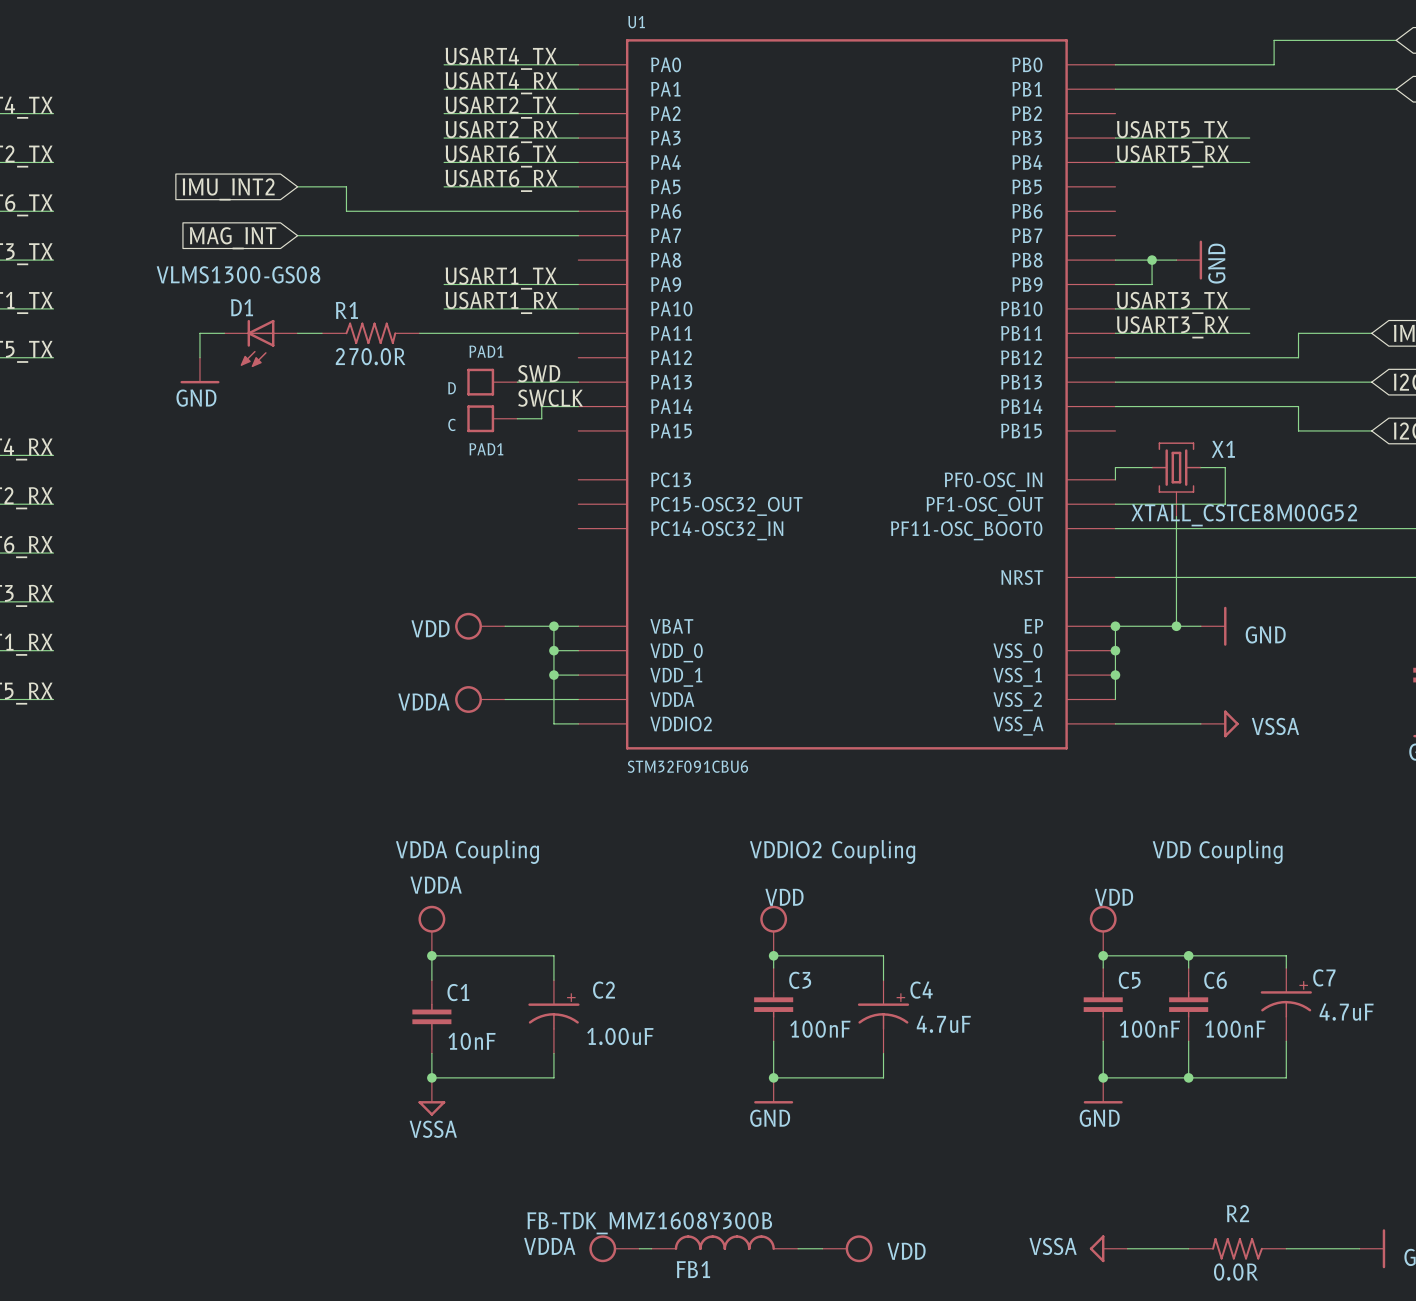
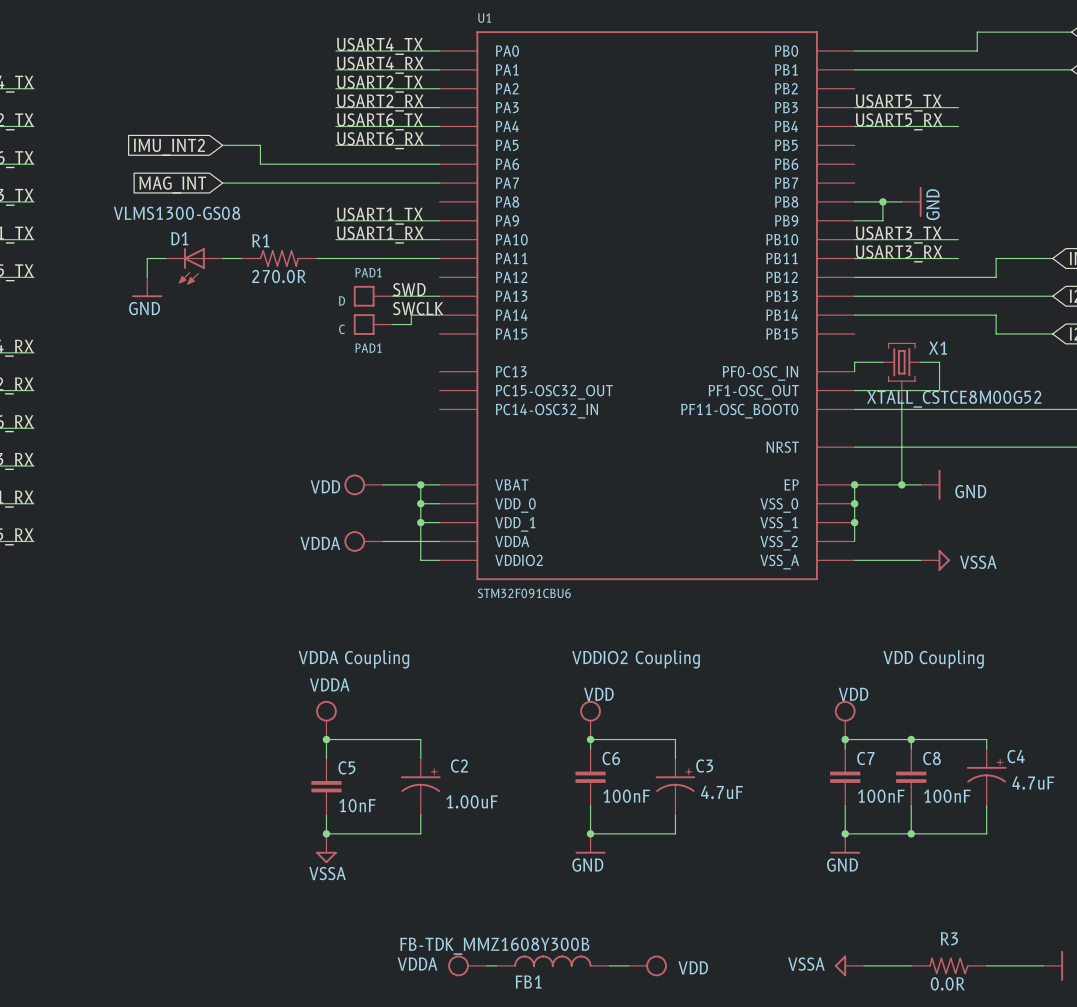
C7 name: C7 (1324, 977) -> C4 (1016, 756)
C3 name: C3 (800, 980) -> C6 (611, 758)
C5 name: C5 (1129, 980) -> C7 (865, 758)
C6 name: C6 (1215, 980) -> C8 (932, 758)
C4 name: C4 (921, 990) -> C3 (704, 766)
C1 name: C1 (458, 992) -> C5 (346, 767)
R2 name: R2 (1237, 1213) -> R3 (949, 938)

